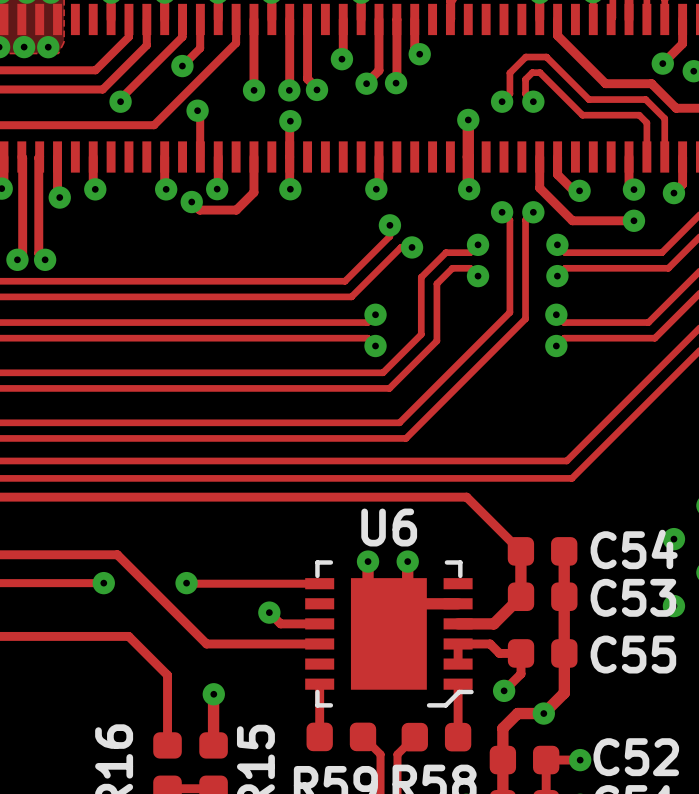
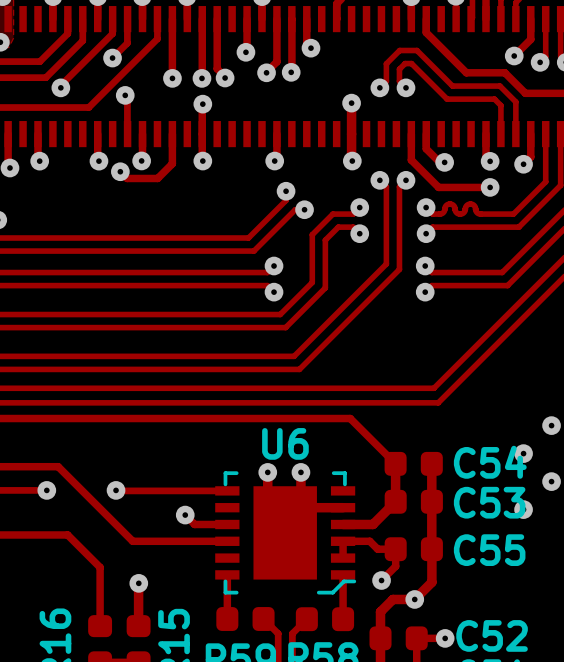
track: none -> (450, 204) (460, 214)
track: none -> (470, 204) (460, 214)
track: none -> (470, 204) (480, 214)
track: (573, 252) (622, 252) -> (439, 214) (449, 204)

